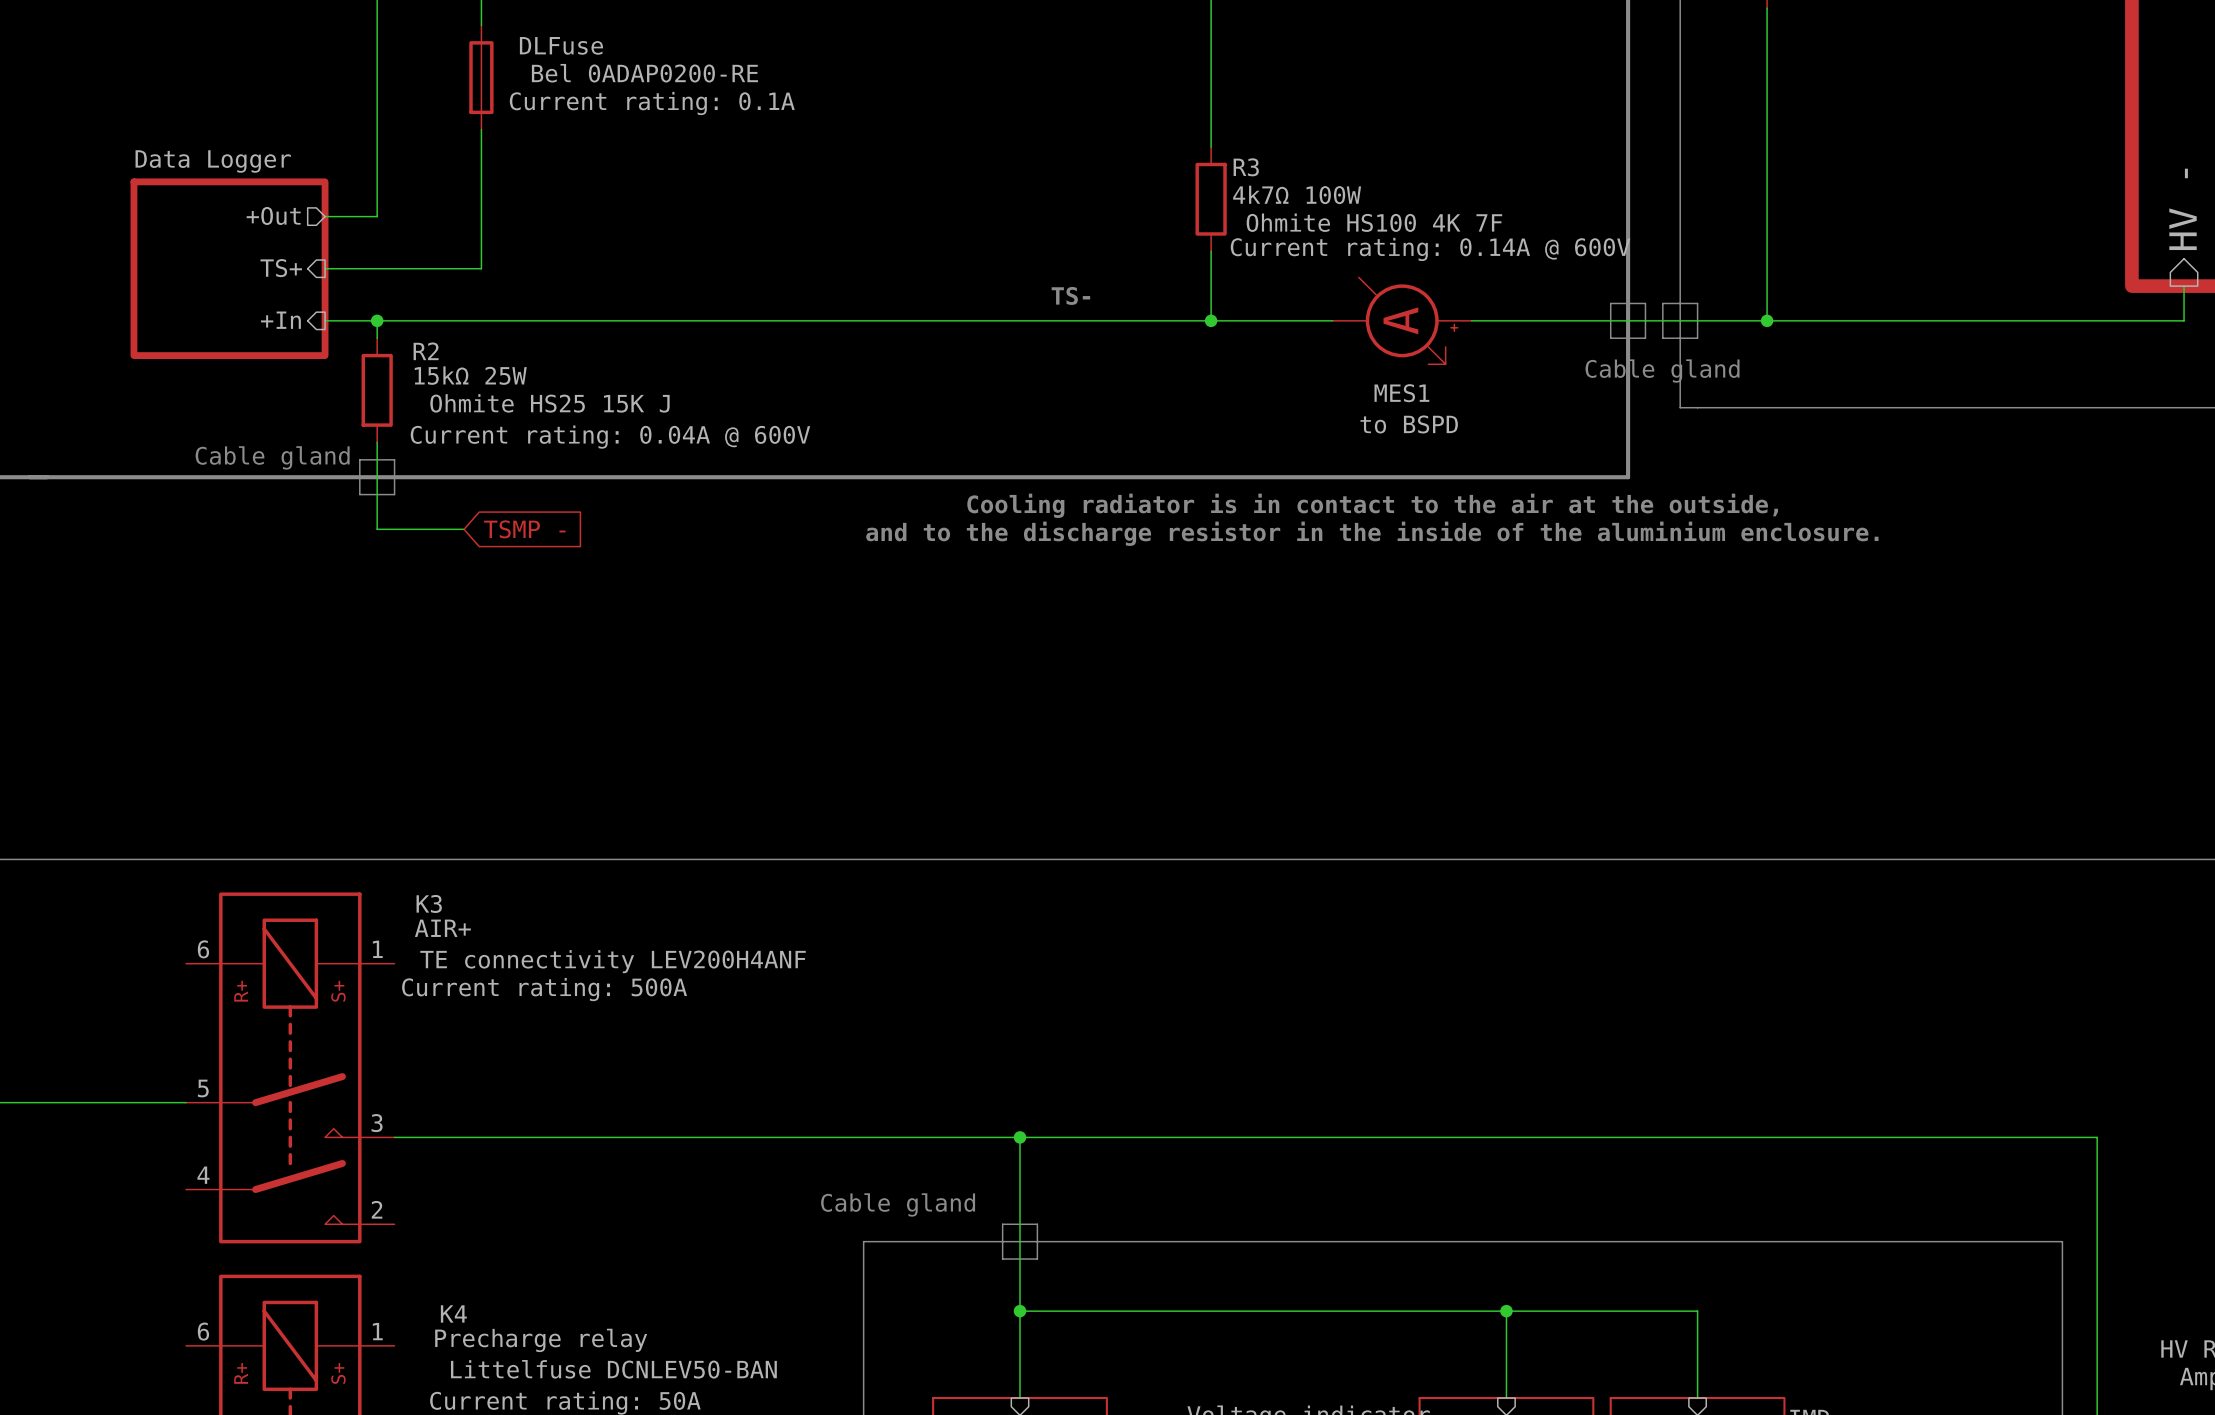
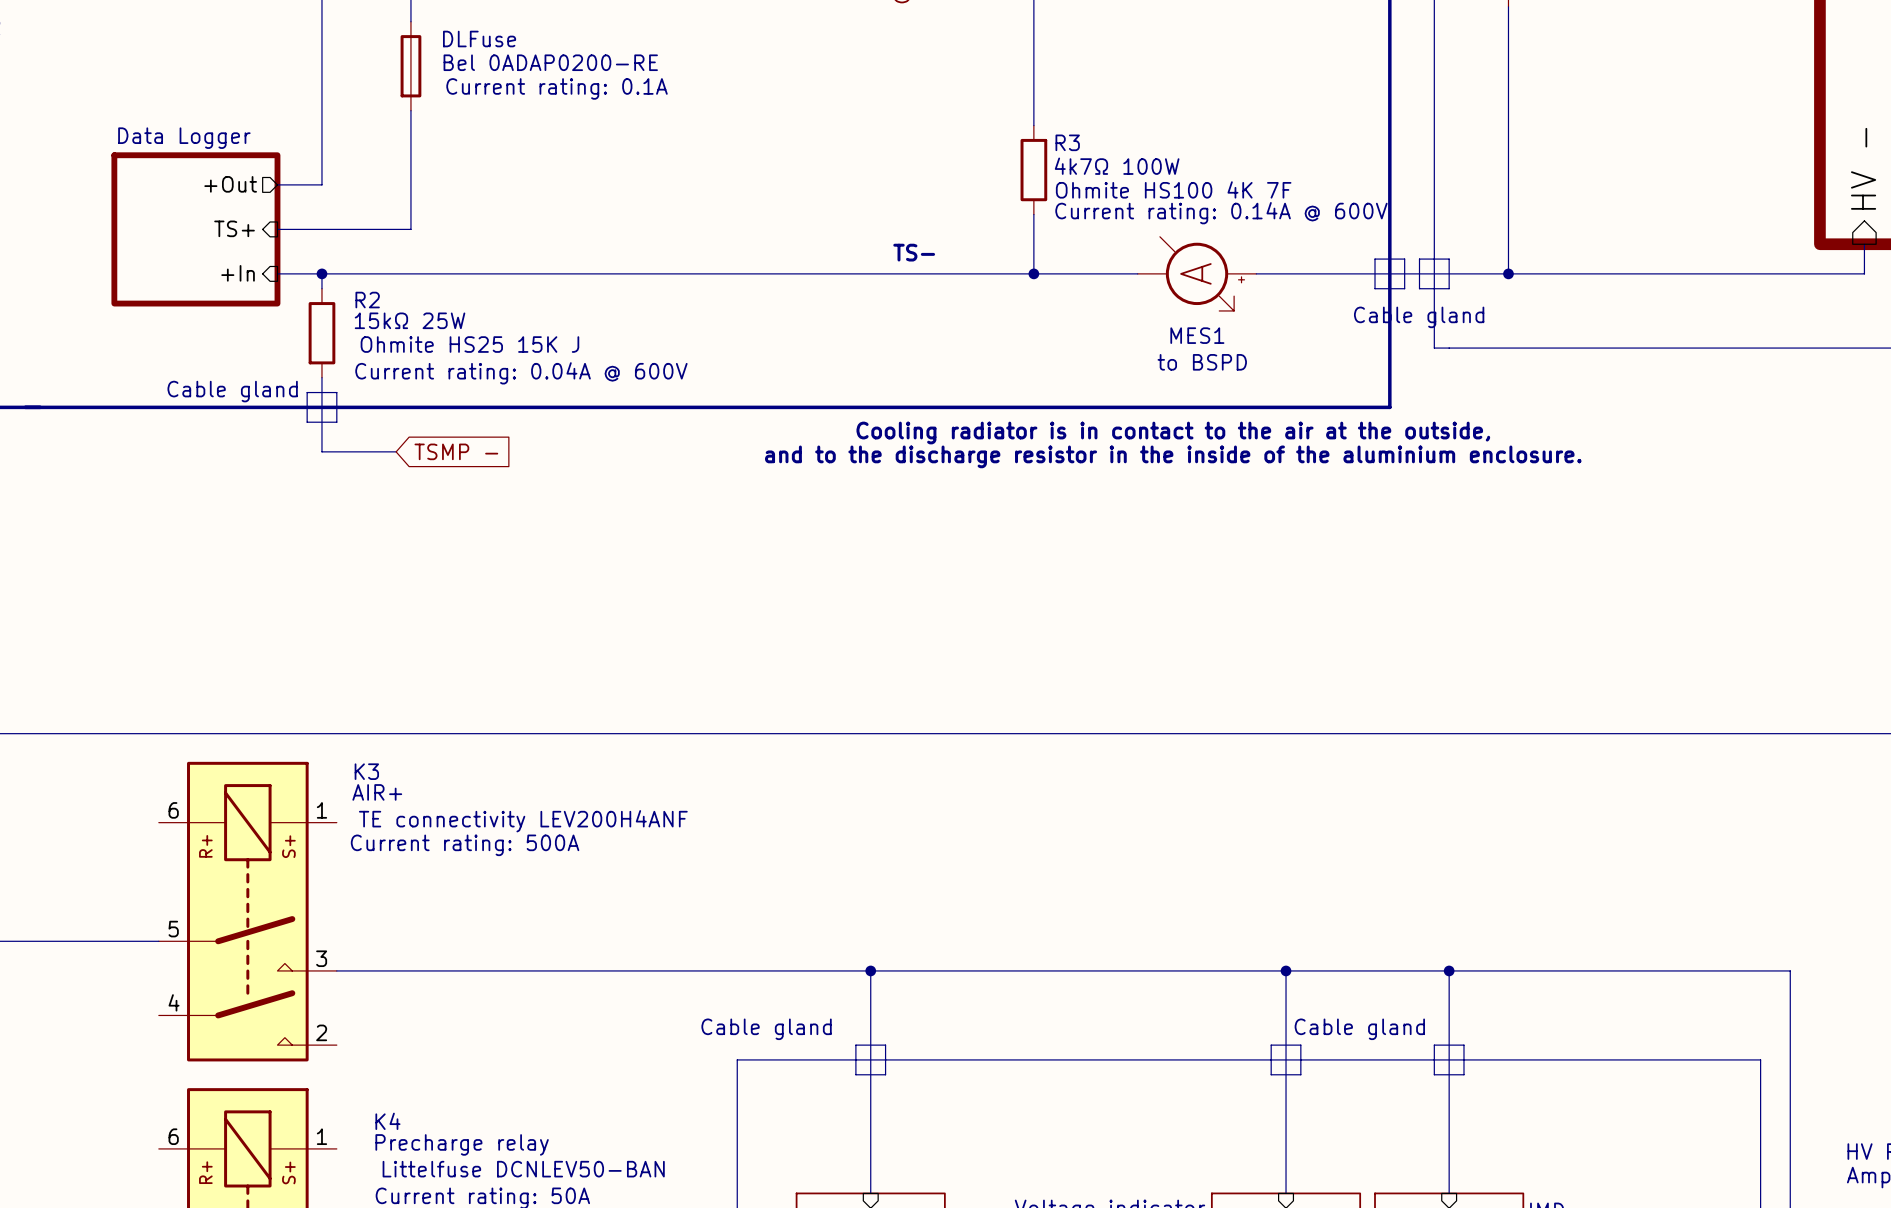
wire: none -> (1286, 970) (1286, 1119)
junction: none -> (1286, 970)
junction: none -> (1449, 970)
text: none -> Cable gland (1359, 1029)
line: none -> (1271, 1045) (1300, 1045) (1300, 1074) (1271, 1074) (1271, 1045)
line: none -> (1434, 1045) (1463, 1045) (1463, 1074) (1434, 1074) (1434, 1045)
wire: (1020, 1311) (1697, 1311) -> (1449, 970) (1449, 1119)
junction: (1020, 1311) -> none
junction: (1506, 1311) -> none

